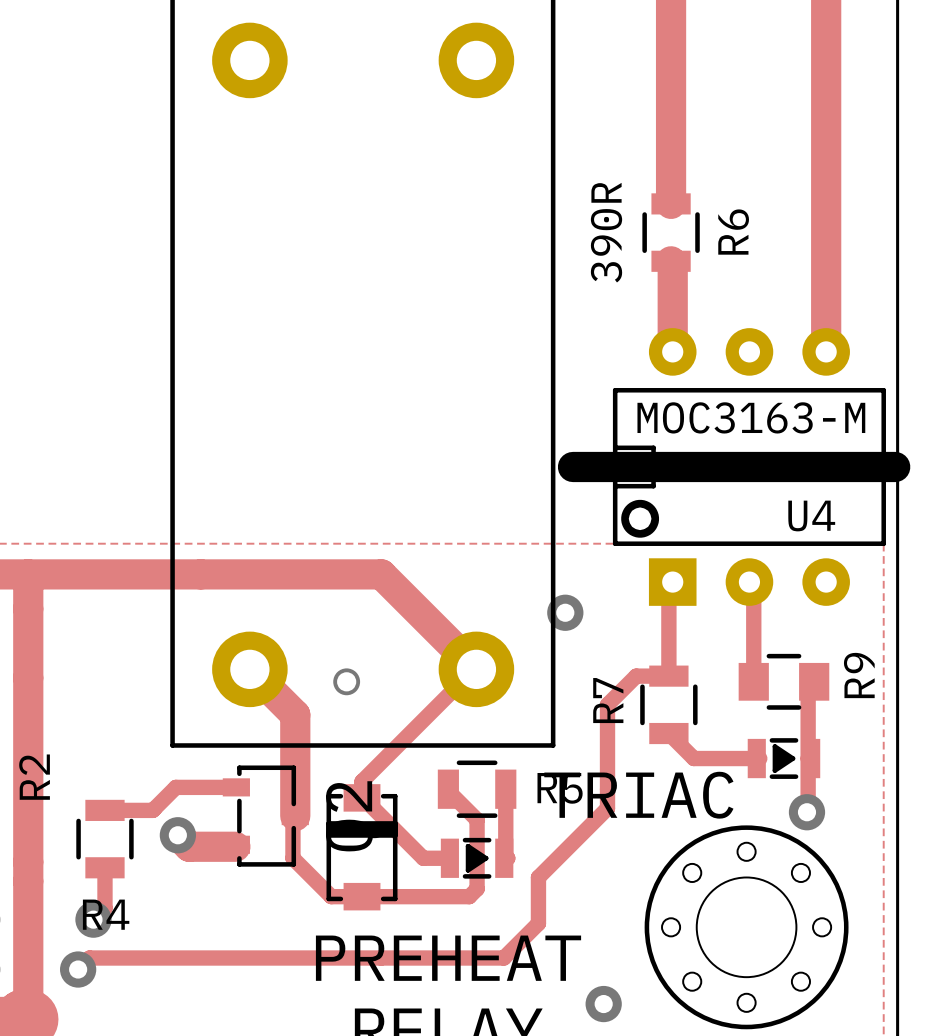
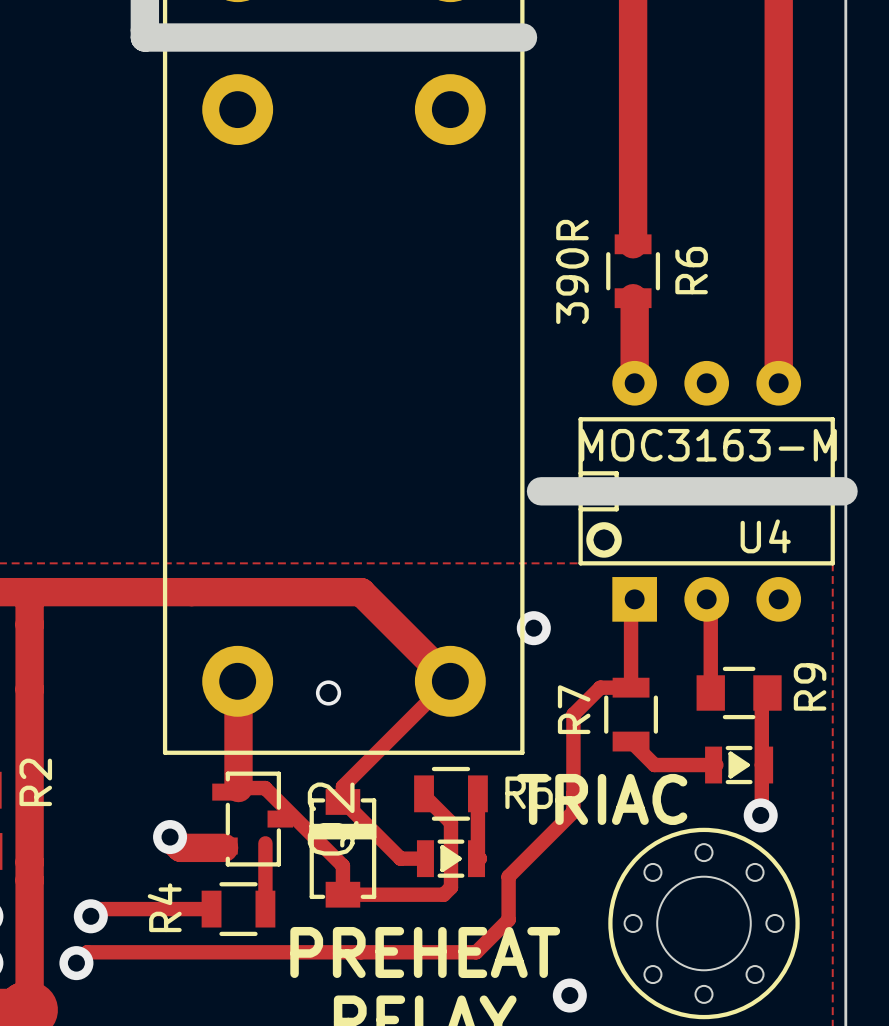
track: (250, 670) (295, 714) (295, 816) (292, 816) (292, 858) (331, 896) (362, 896) -> (237, 681) (238, 788) (265, 788) (342, 865) (342, 894)
track: (236, 787) (175, 787) (152, 810) (104, 810) -> none
R4 rotation: 0° (104, 839) -> 90° clockwise (238, 909)
R4 position: (104, 839) -> (238, 909)
track: none -> (265, 843) (265, 909)
track: (104, 865) (104, 908) (101, 911) -> (211, 909) (98, 909)

